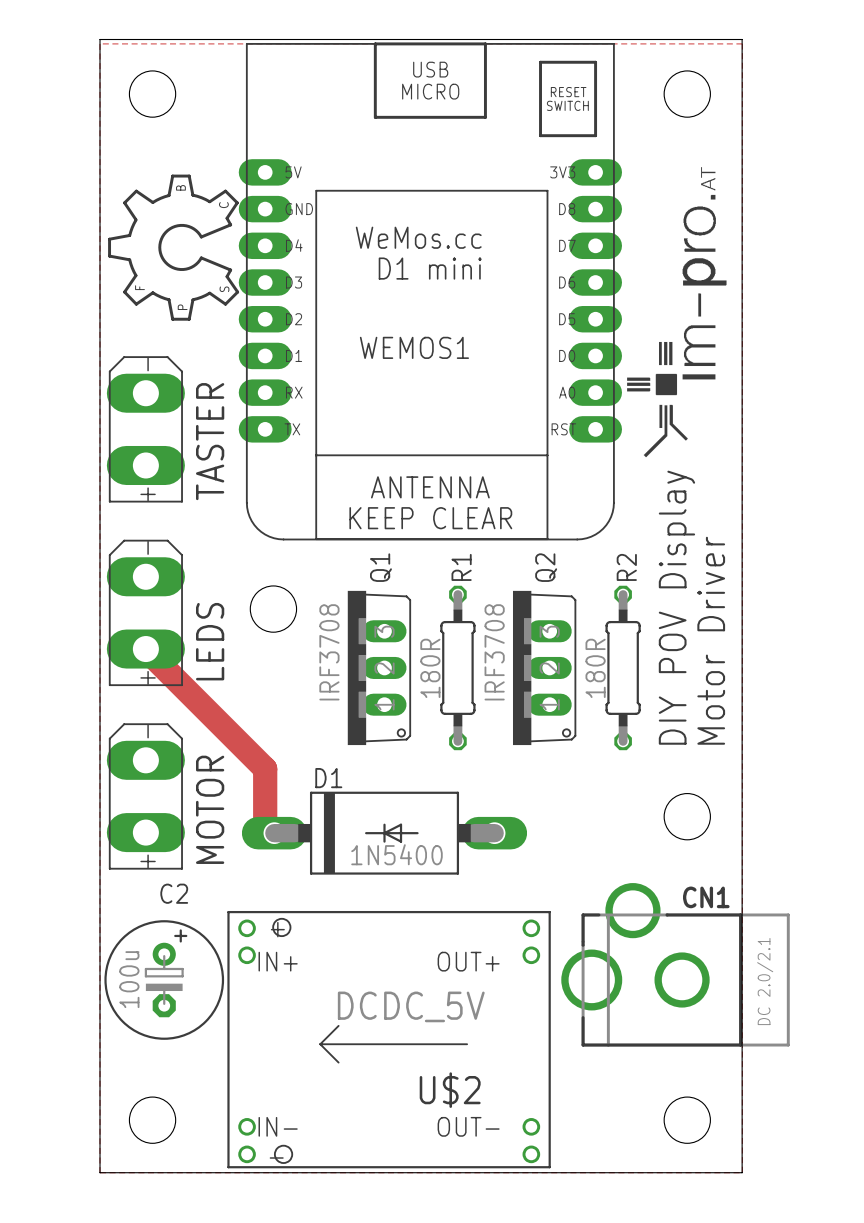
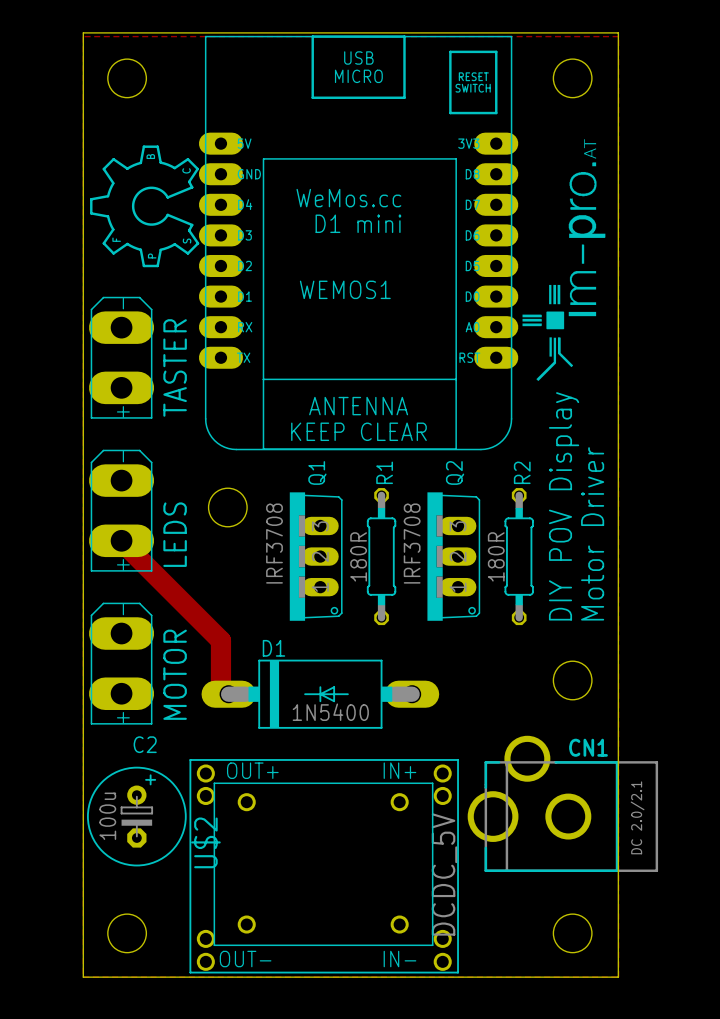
U$2 footprint: [227, 910, 551, 1169] -> [189, 759, 459, 974]
U$2 value position: DCDC_5V (411, 1006) -> DCDC_5V (444, 874)
U$2 name position: U$2 (450, 1090) -> U$2 (205, 842)

